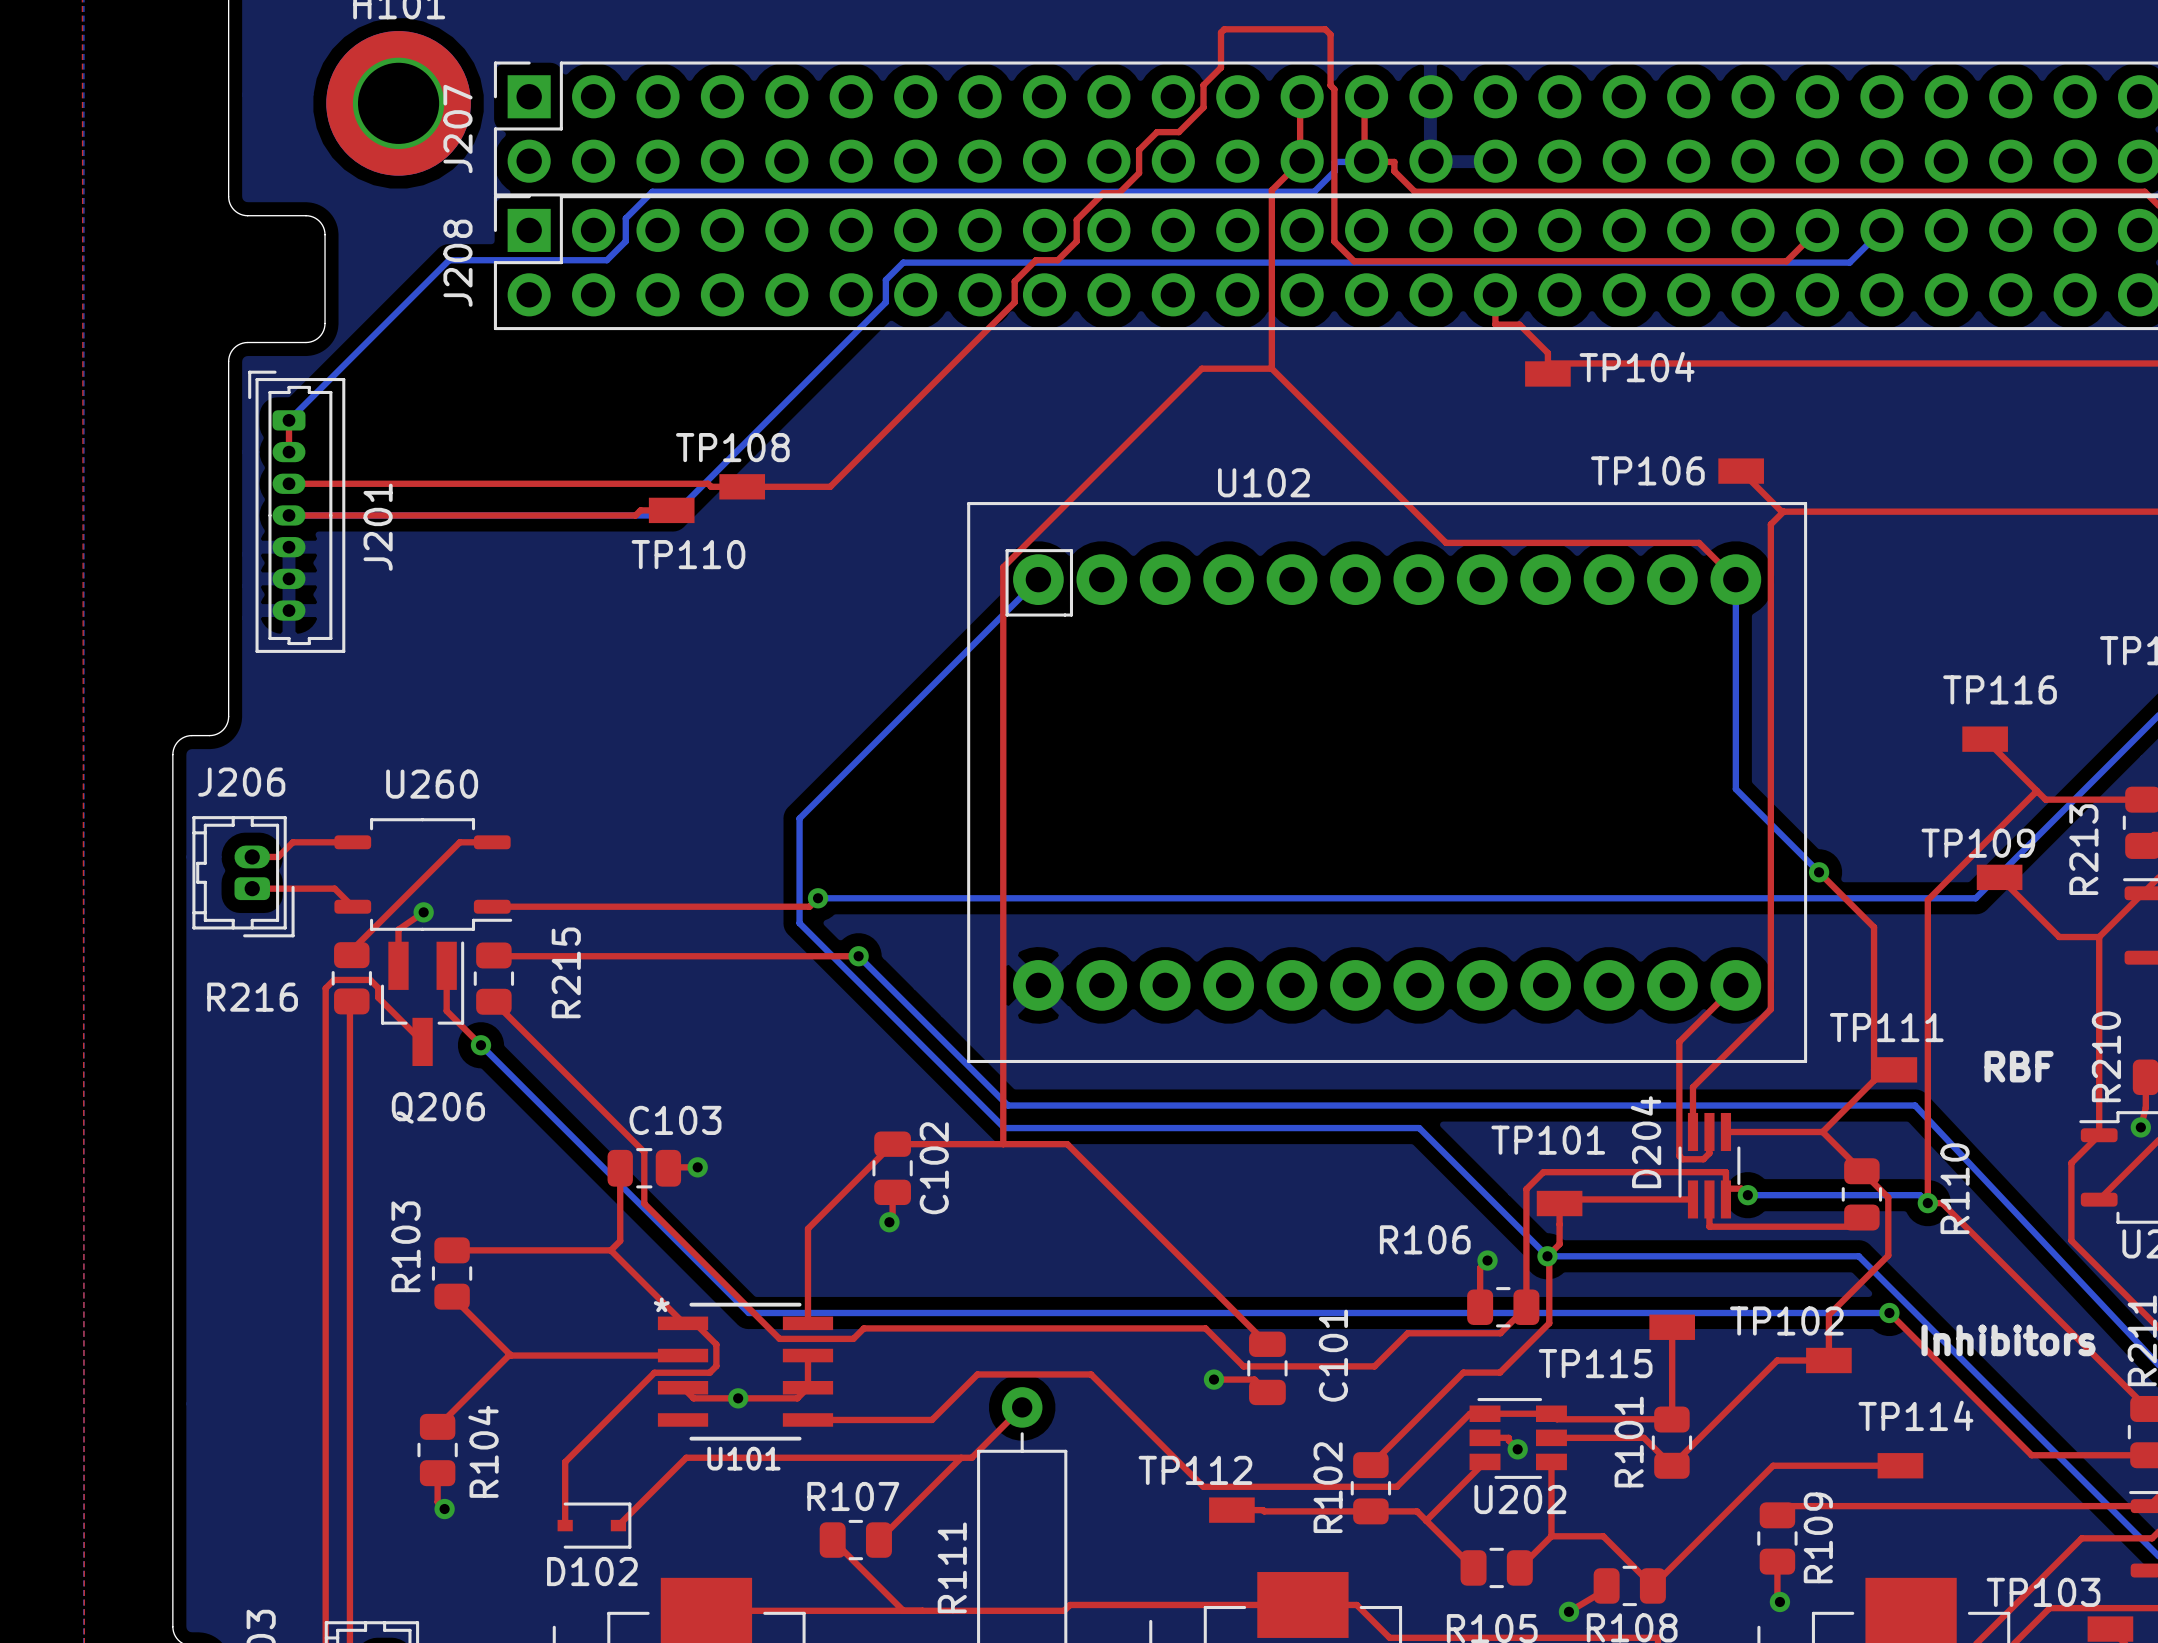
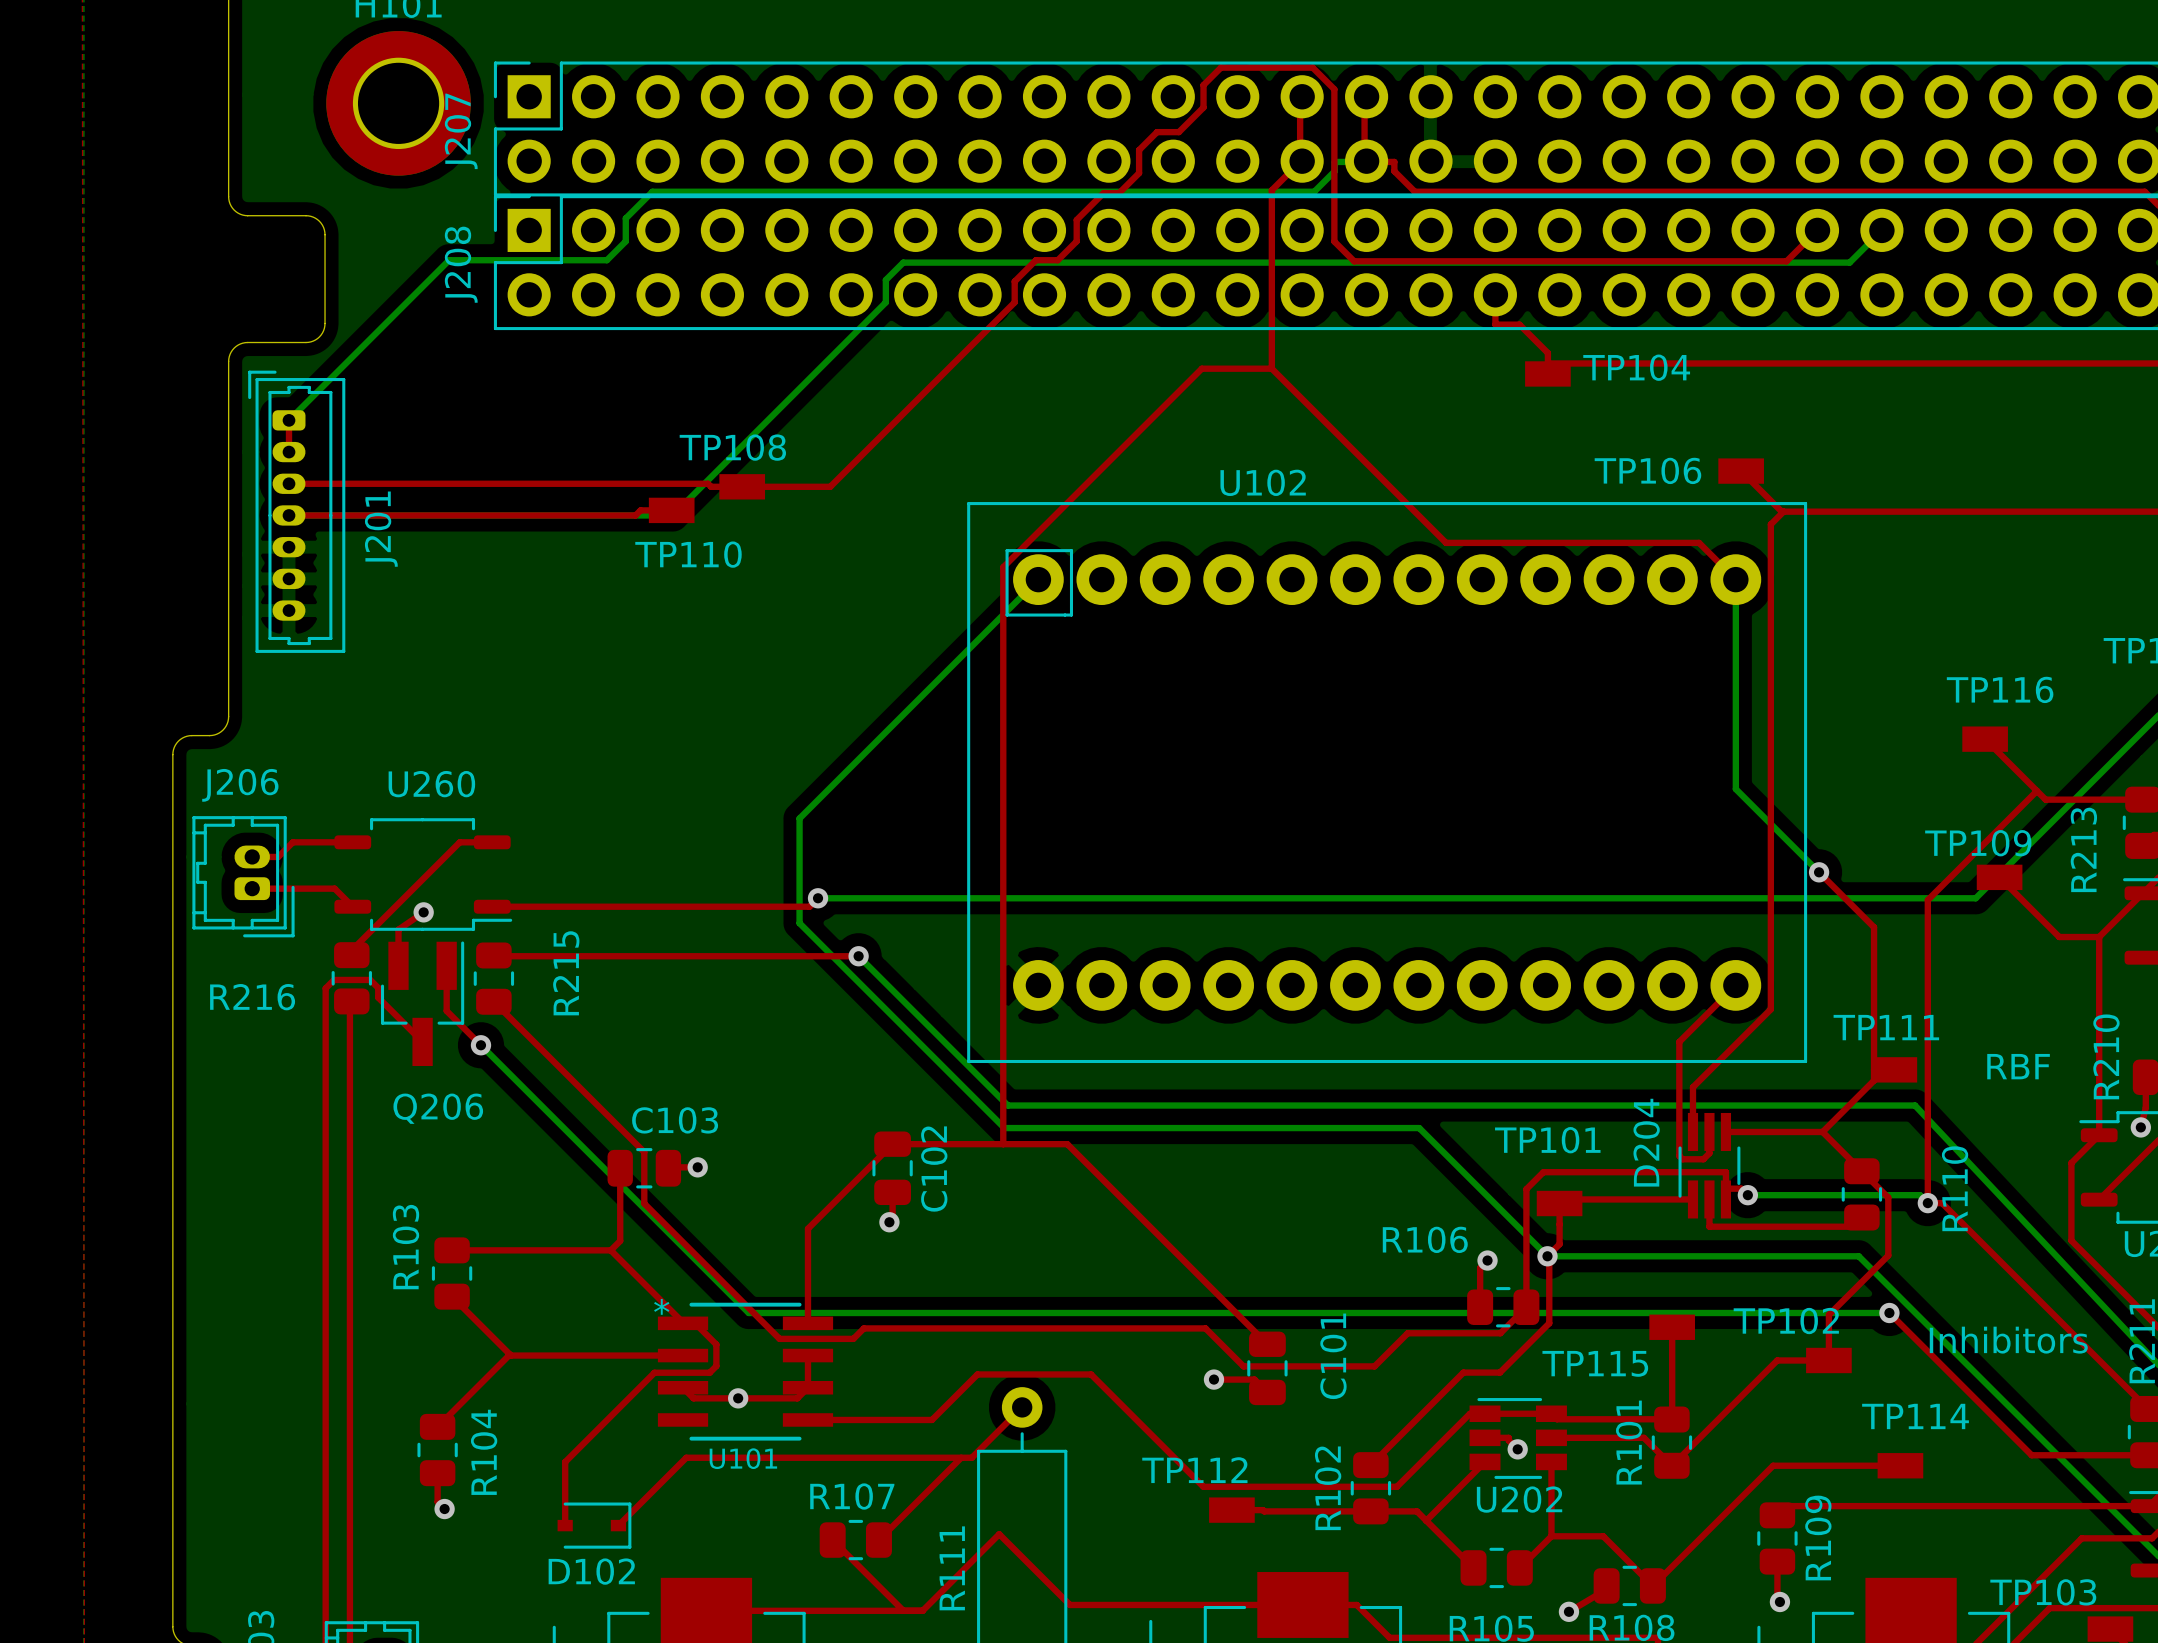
top track: (1221, 67) (1221, 32) (1224, 29) (1325, 29) (1330, 34) (1330, 85) -> (1221, 67) (1312, 67) (1330, 85)
top track: (1069, 1604) (1064, 1610) (922, 1610) -> (1069, 1604) (999, 1534) (922, 1610)

